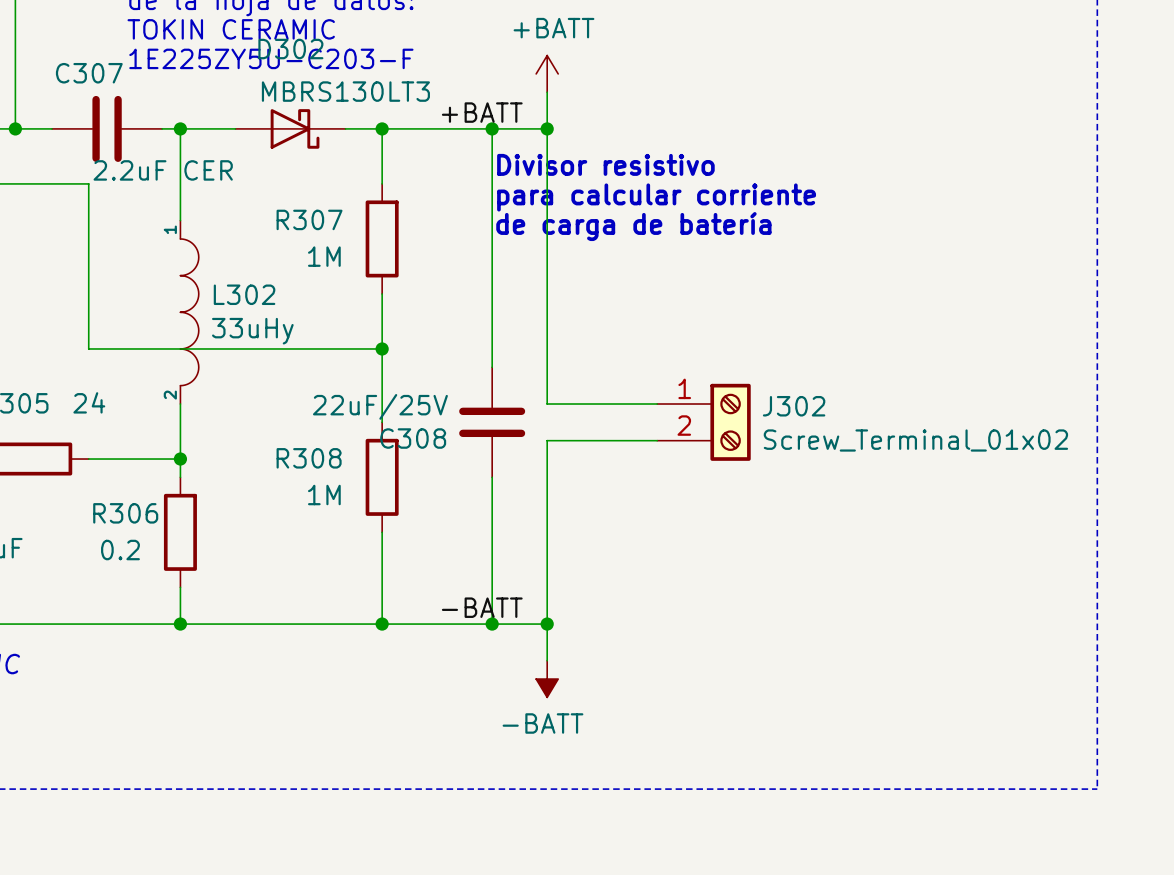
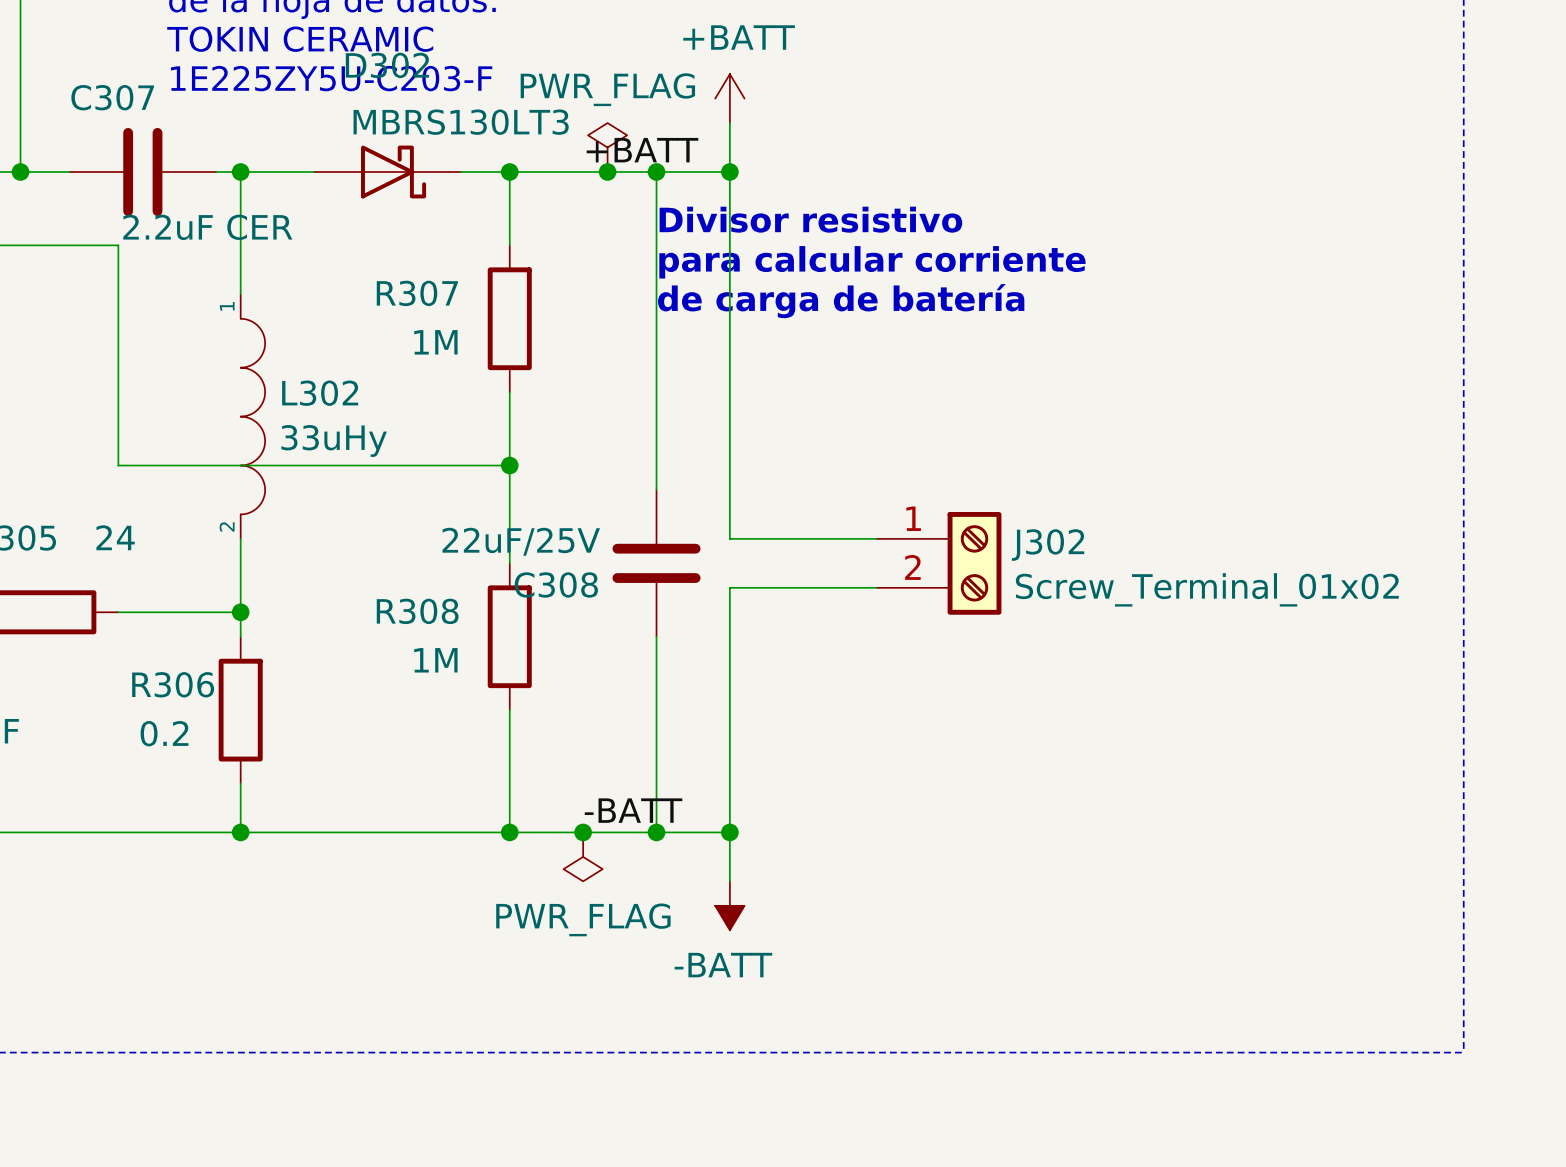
power symbol: none -> PWR_FLAG (607, 147)
junction: none -> (607, 171)
junction: none -> (583, 832)
power symbol: none -> PWR_FLAG (583, 856)

